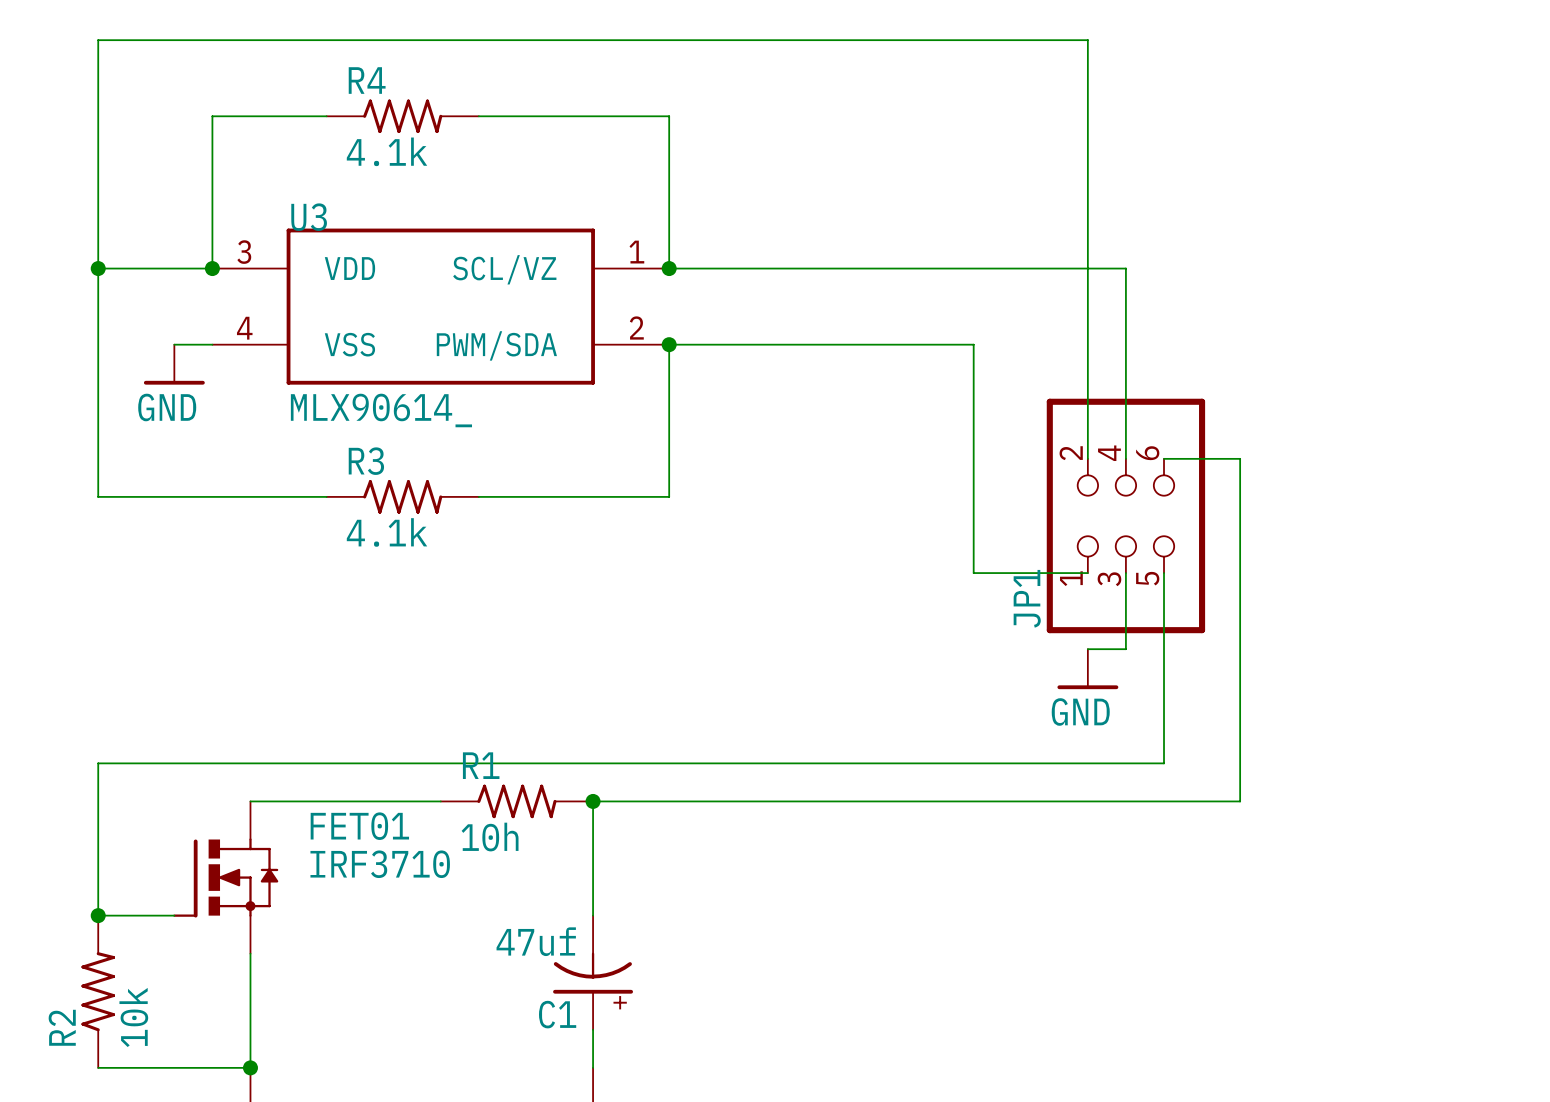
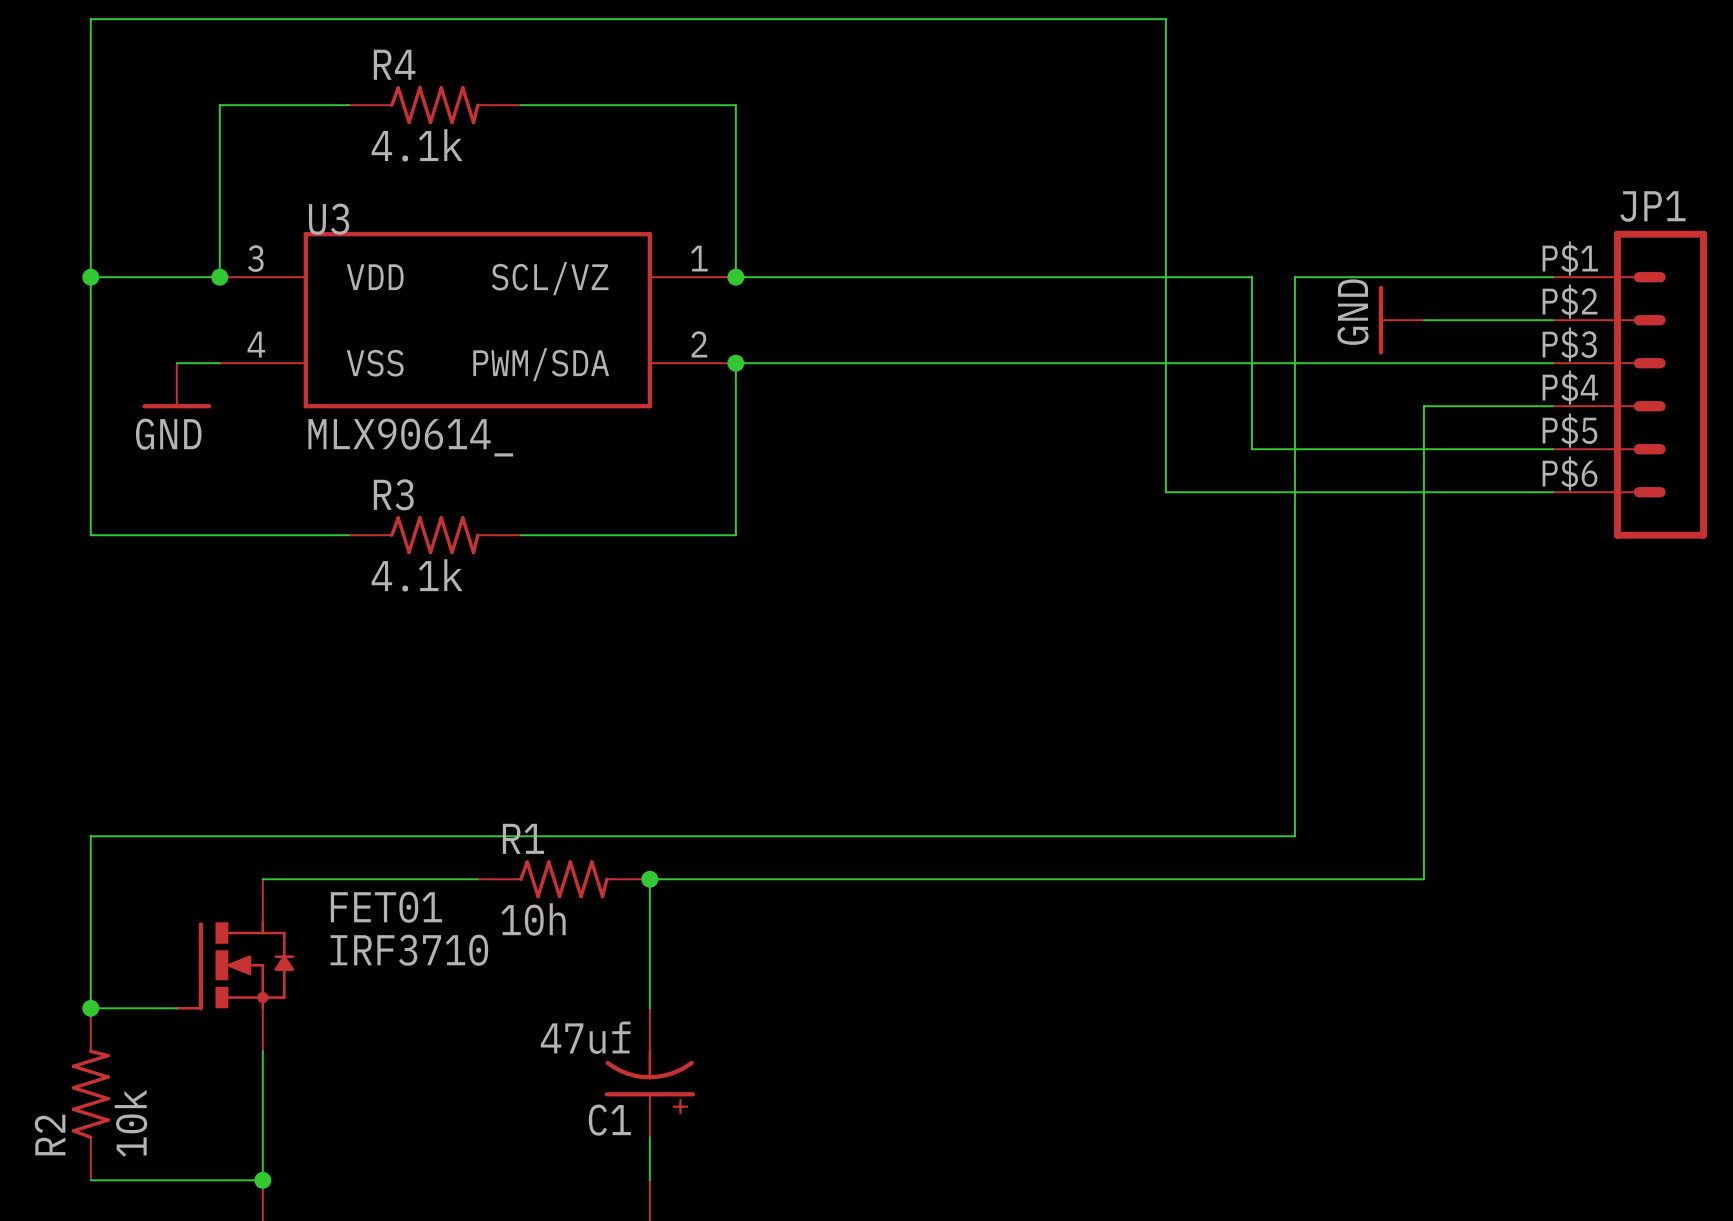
wire: (1049, 40) (1087, 40) (1087, 458) -> (1165, 19) (1165, 492) (1294, 492)
wire: none -> (1552, 277) (1294, 277) (1294, 621)
power symbol: none -> GND (1401, 320)
wire: none -> (1423, 320) (1552, 320)
wire: (973, 344) (973, 573) (1087, 573) -> (1079, 363) (1552, 363)
JP1 symbol: [1046, 398, 1206, 634] -> [1552, 230, 1707, 539]
wire: (1125, 420) (1125, 458) -> (1251, 449) (1552, 449)
wire: (1240, 458) (1240, 801) -> (1552, 406) (1423, 406) (1423, 879) (1380, 879)
wire: none -> (1380, 492) (1552, 492)
wire: (1125, 573) (1125, 649) (1087, 649) -> none
JP1 name position: JP1 (1027, 598) -> JP1 (1652, 206)
power symbol: GND (1087, 669) -> none

